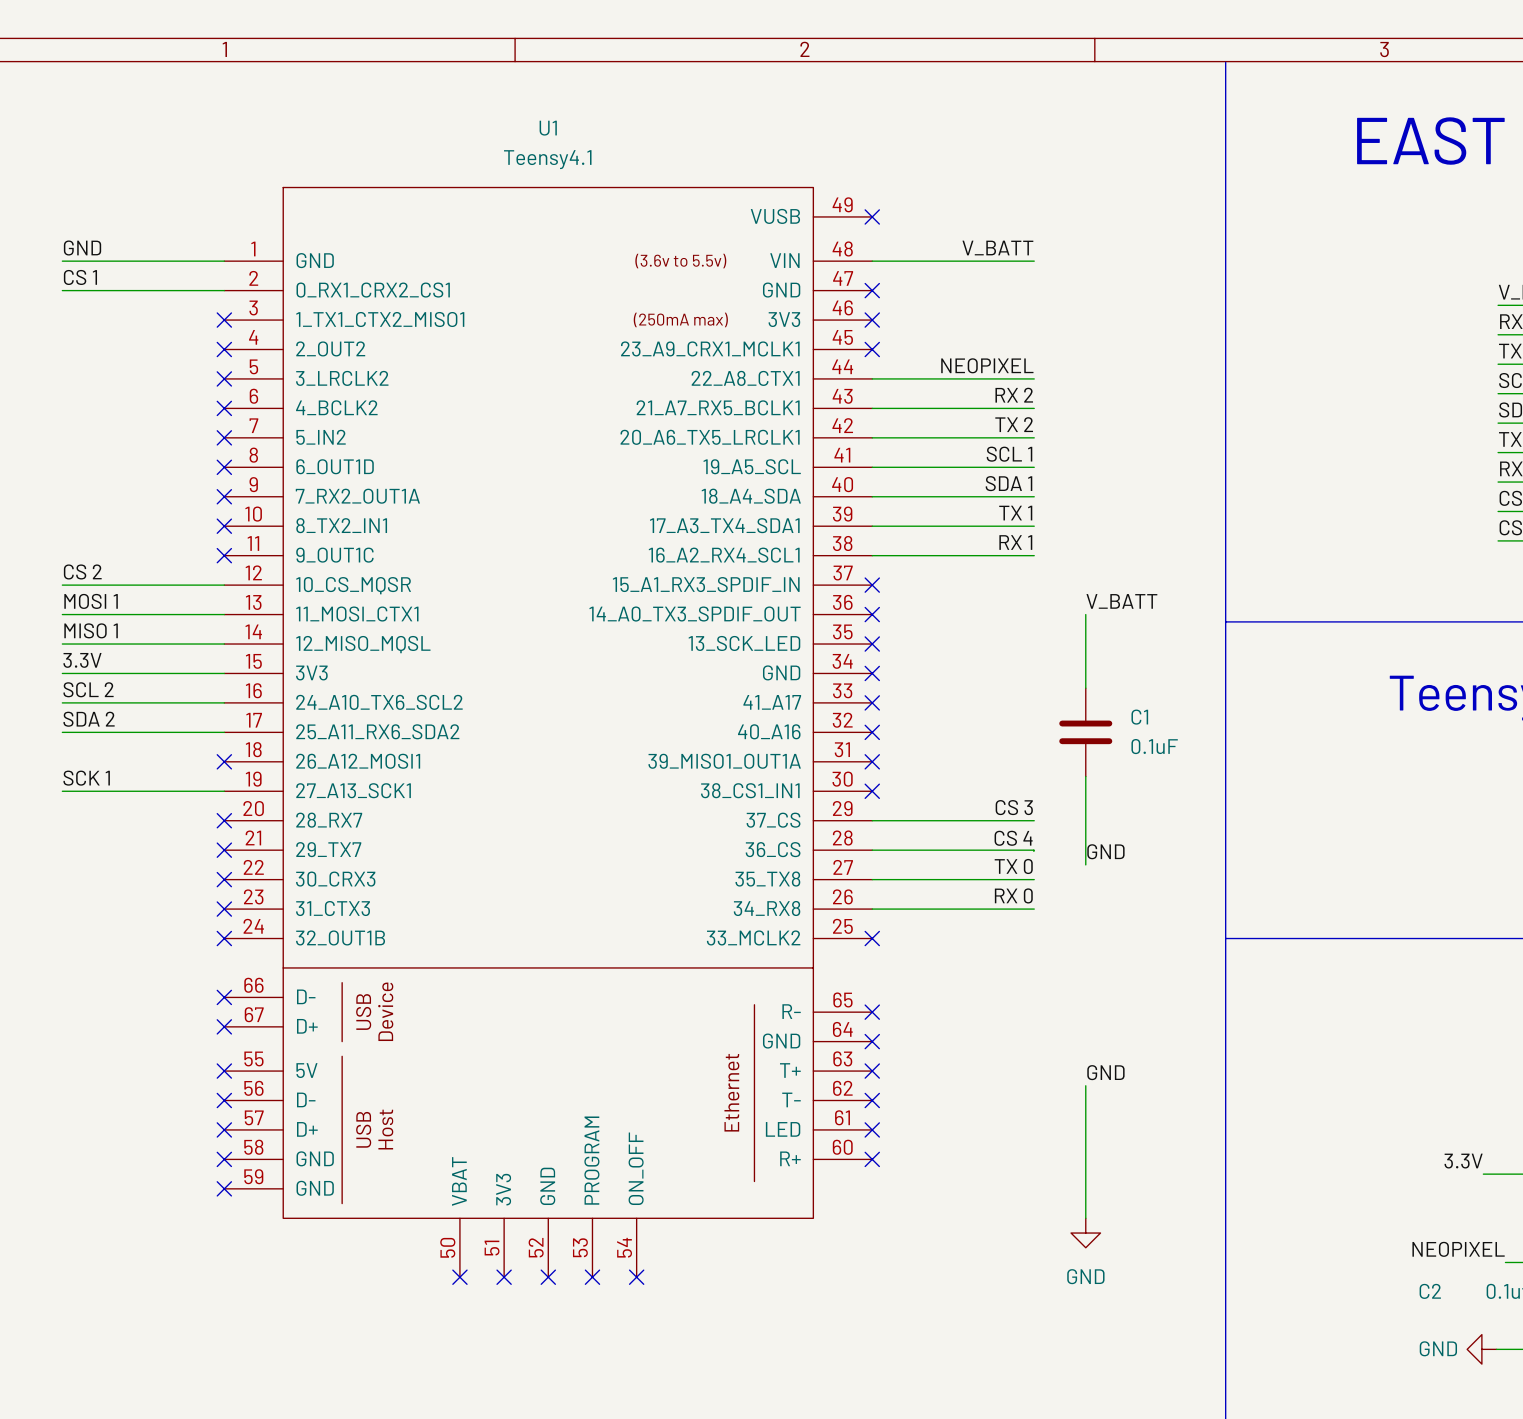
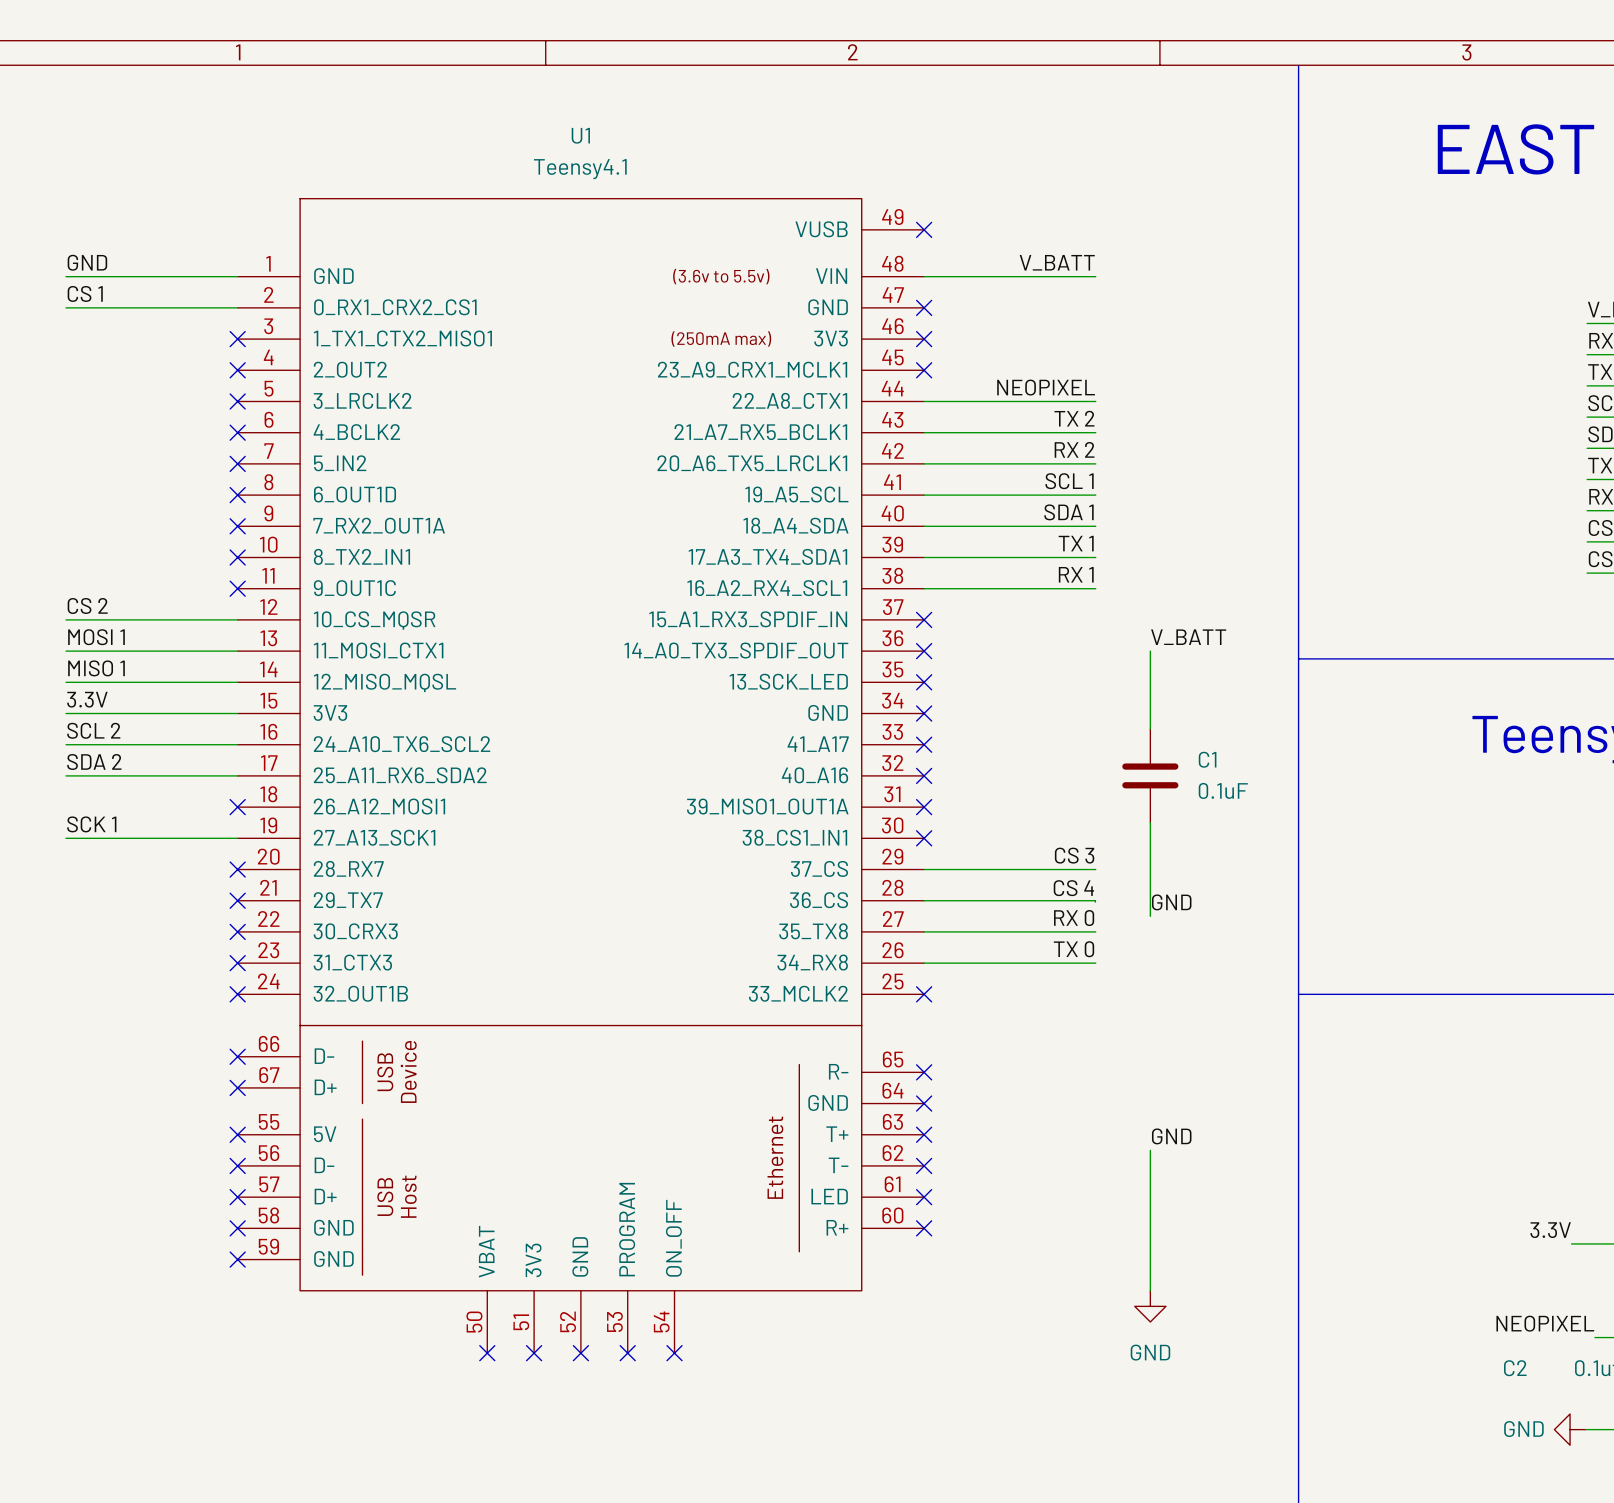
label: RX 2 (1014, 395) -> TX 2 (1074, 418)
label: TX 2 (1014, 424) -> RX 2 (1074, 449)
label: TX 0 (1013, 866) -> RX 0 (1074, 918)
label: RX 0 (1013, 895) -> TX 0 (1074, 949)

